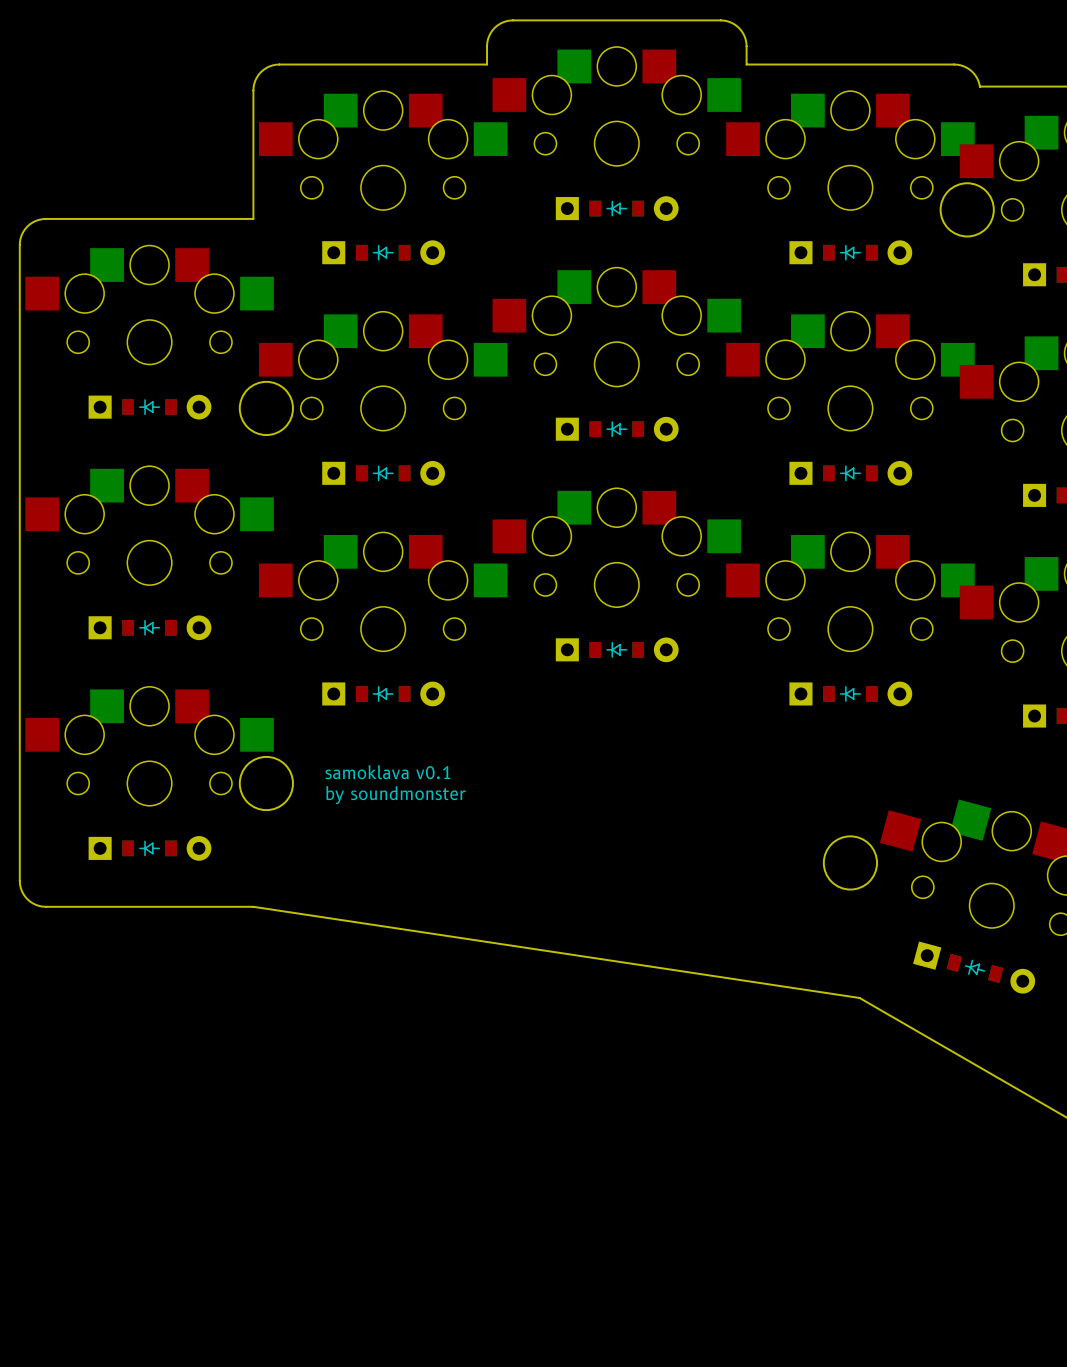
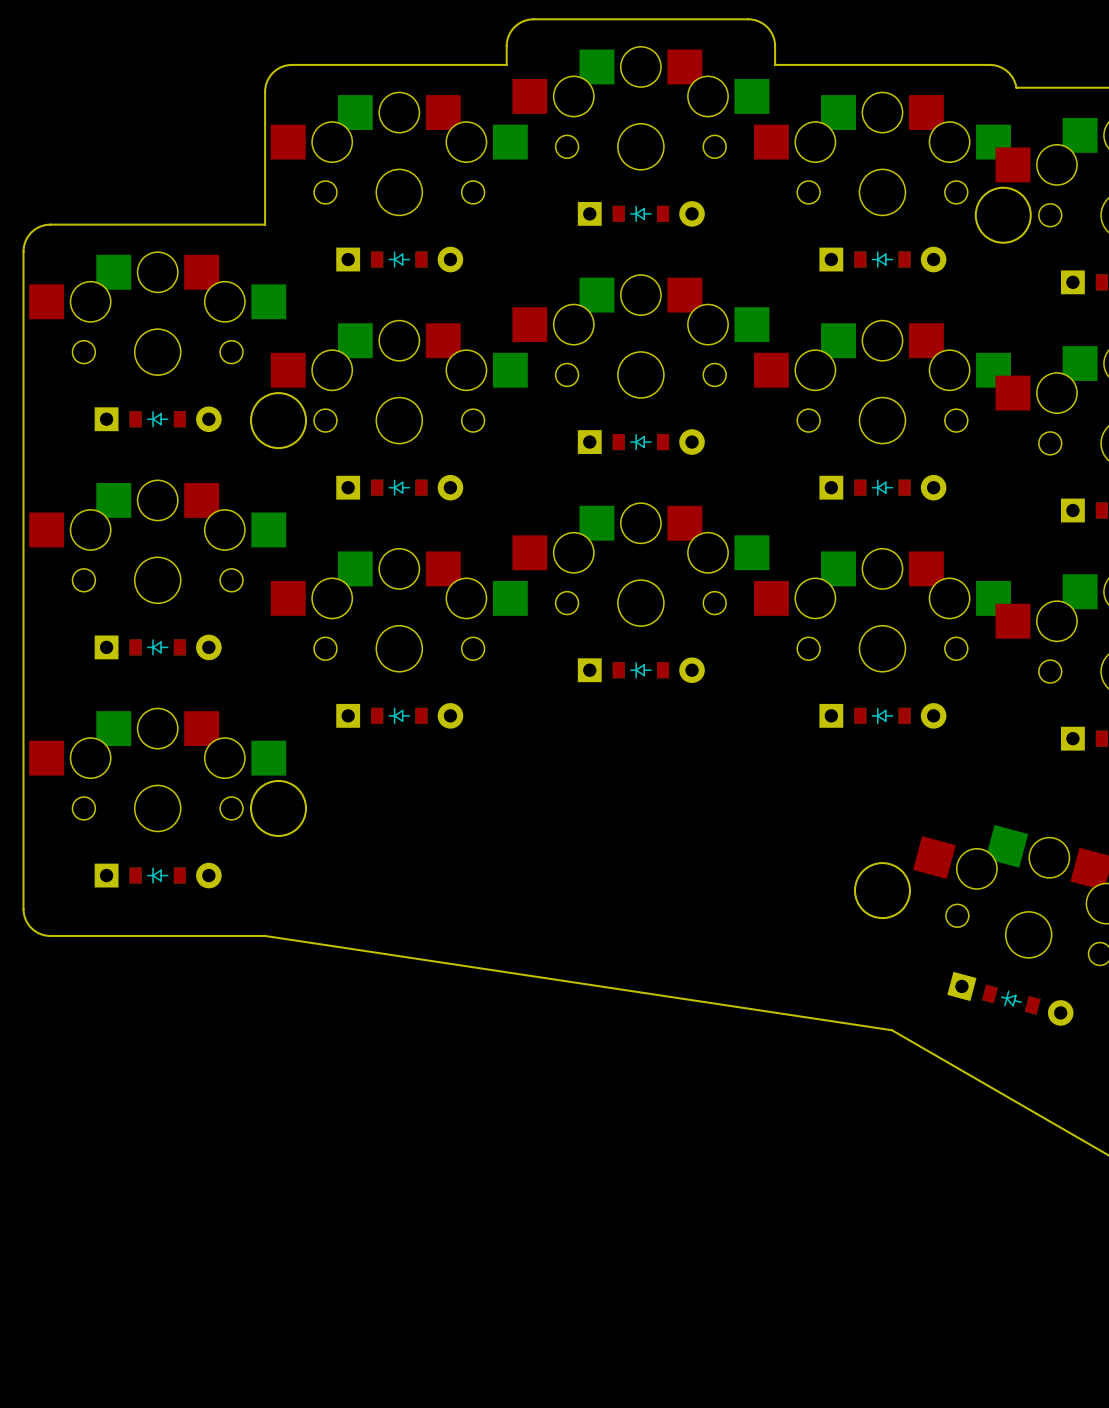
text: samoklava v0.1 (387, 772) -> none
text: by soundmonster (396, 795) -> none

